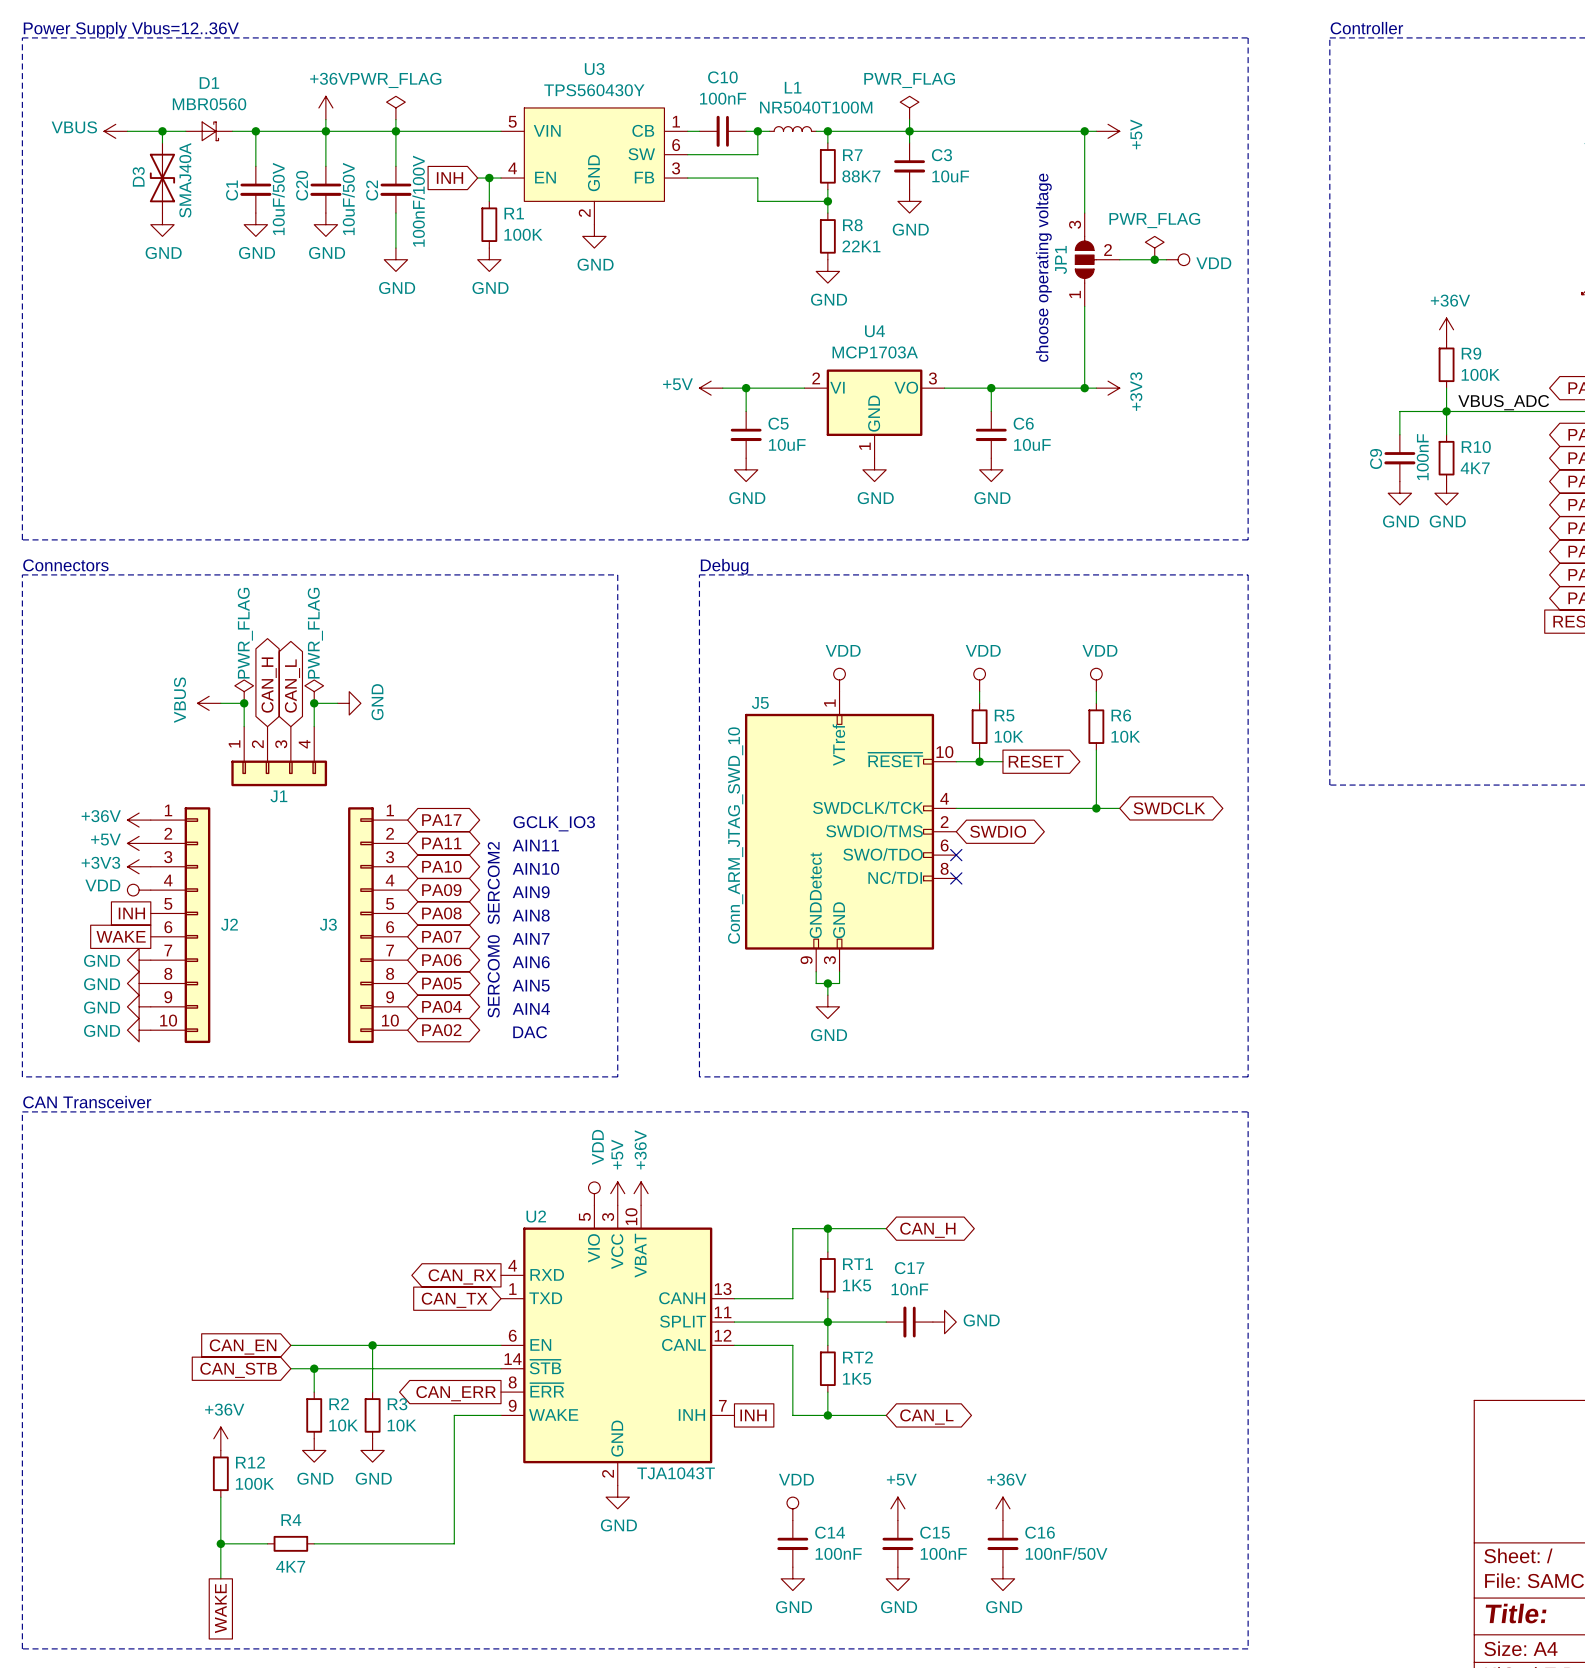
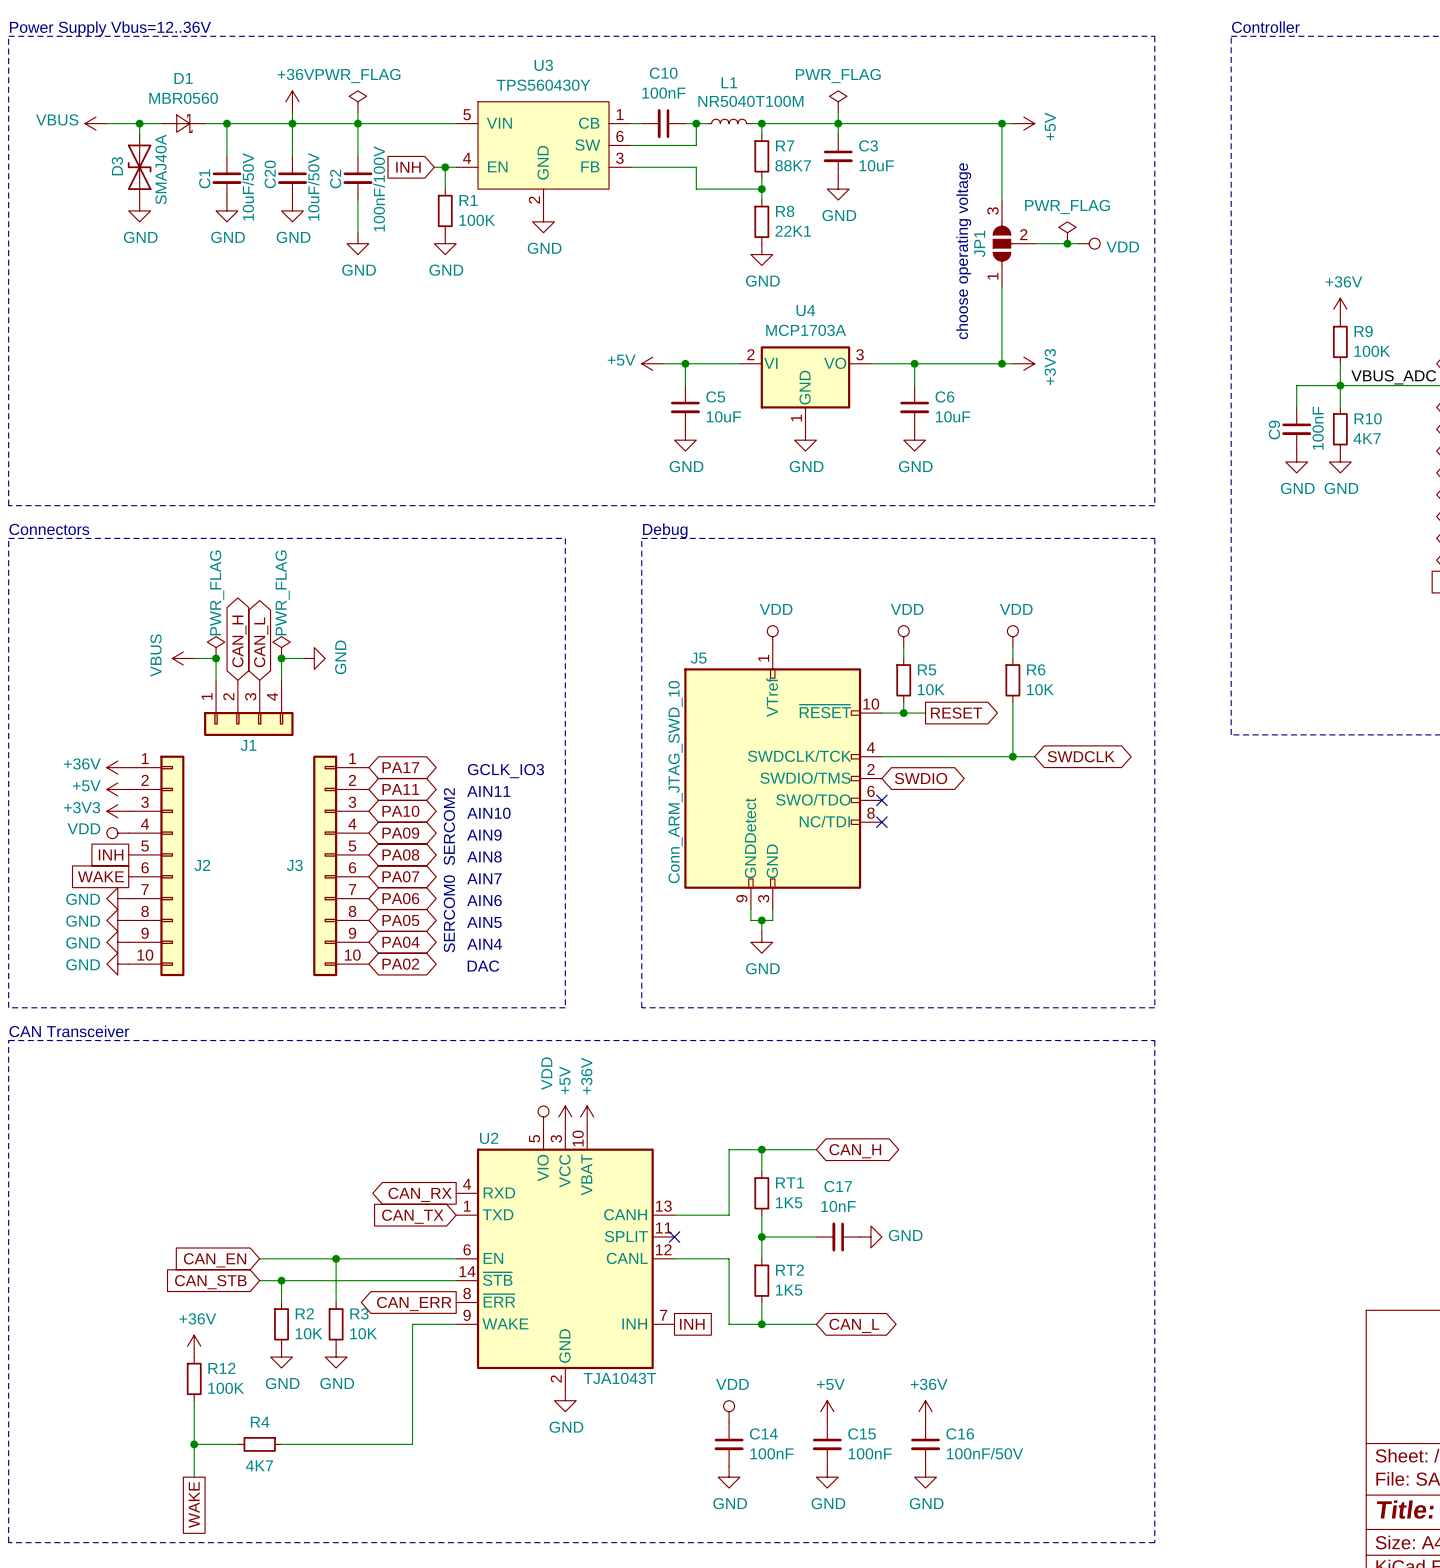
wire: (734, 1322) (827, 1322) -> none
no-connect mark: none -> (674, 1237)

